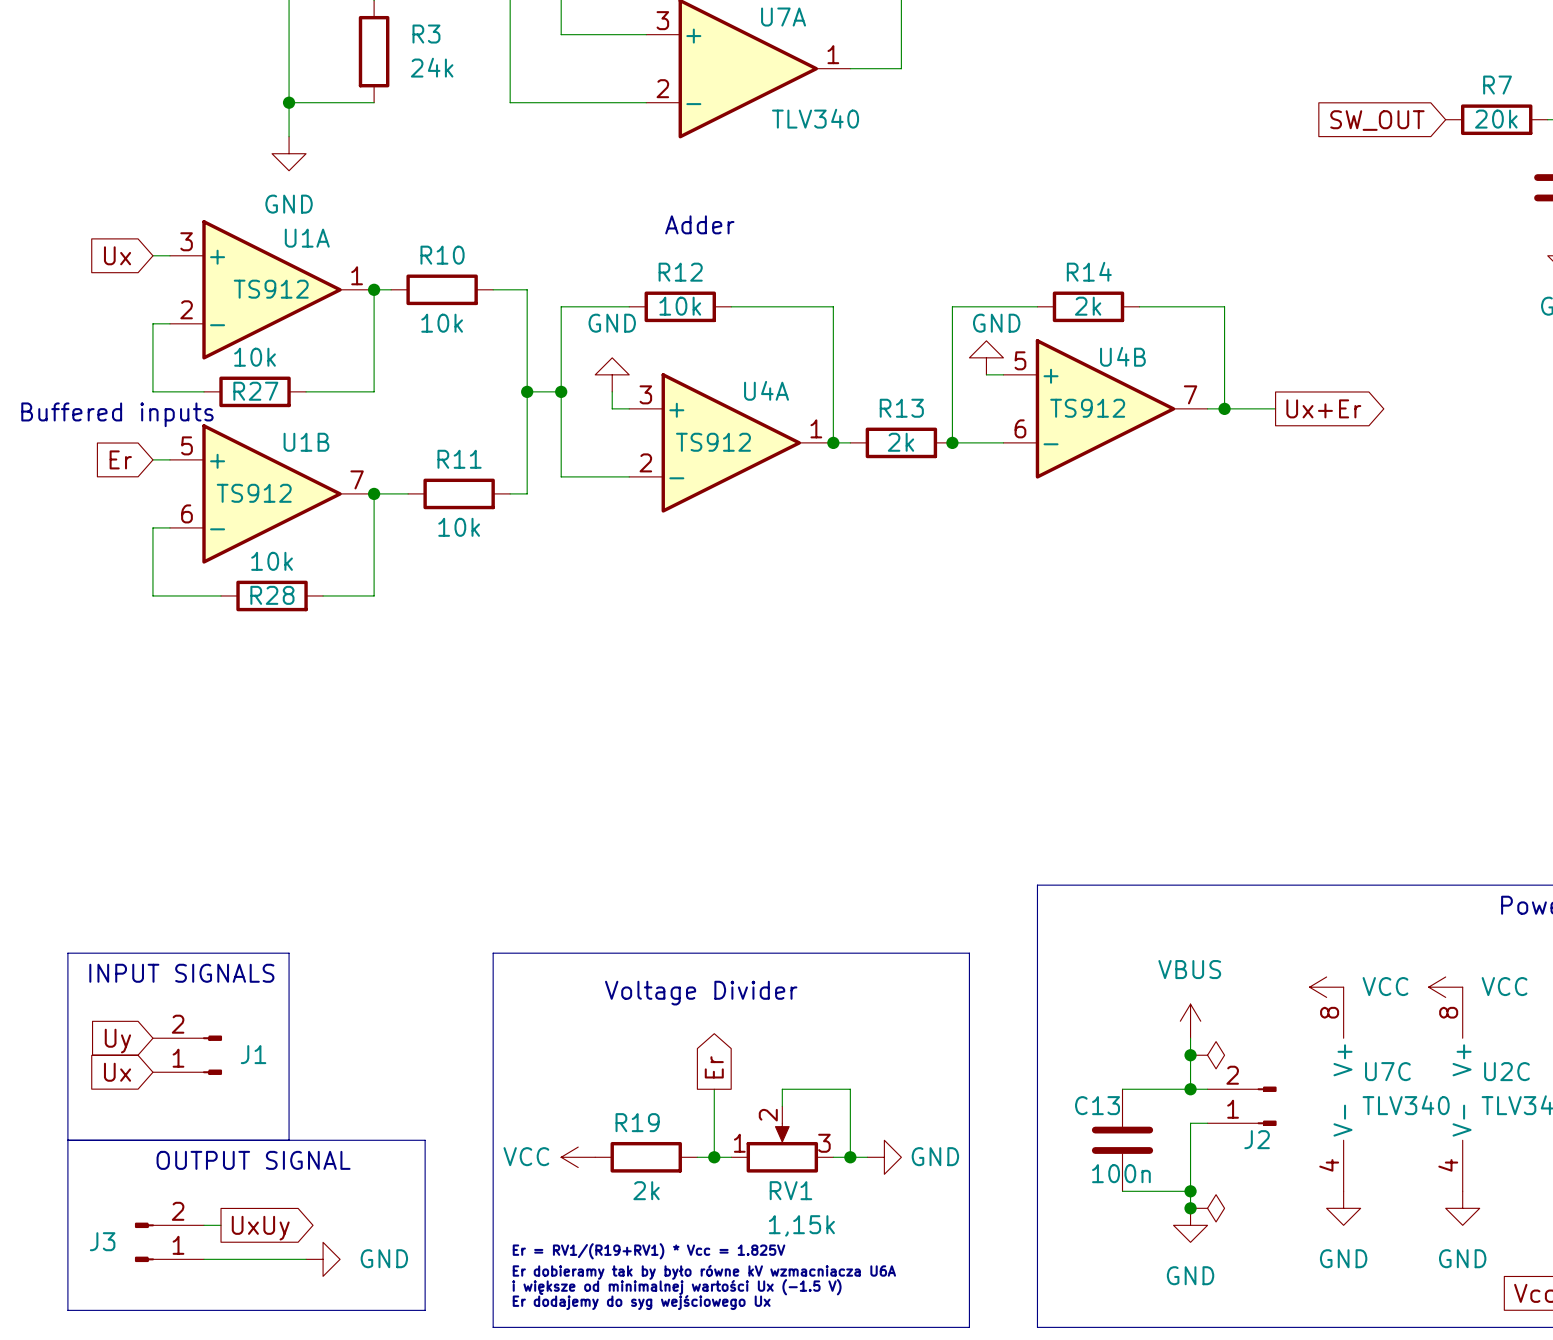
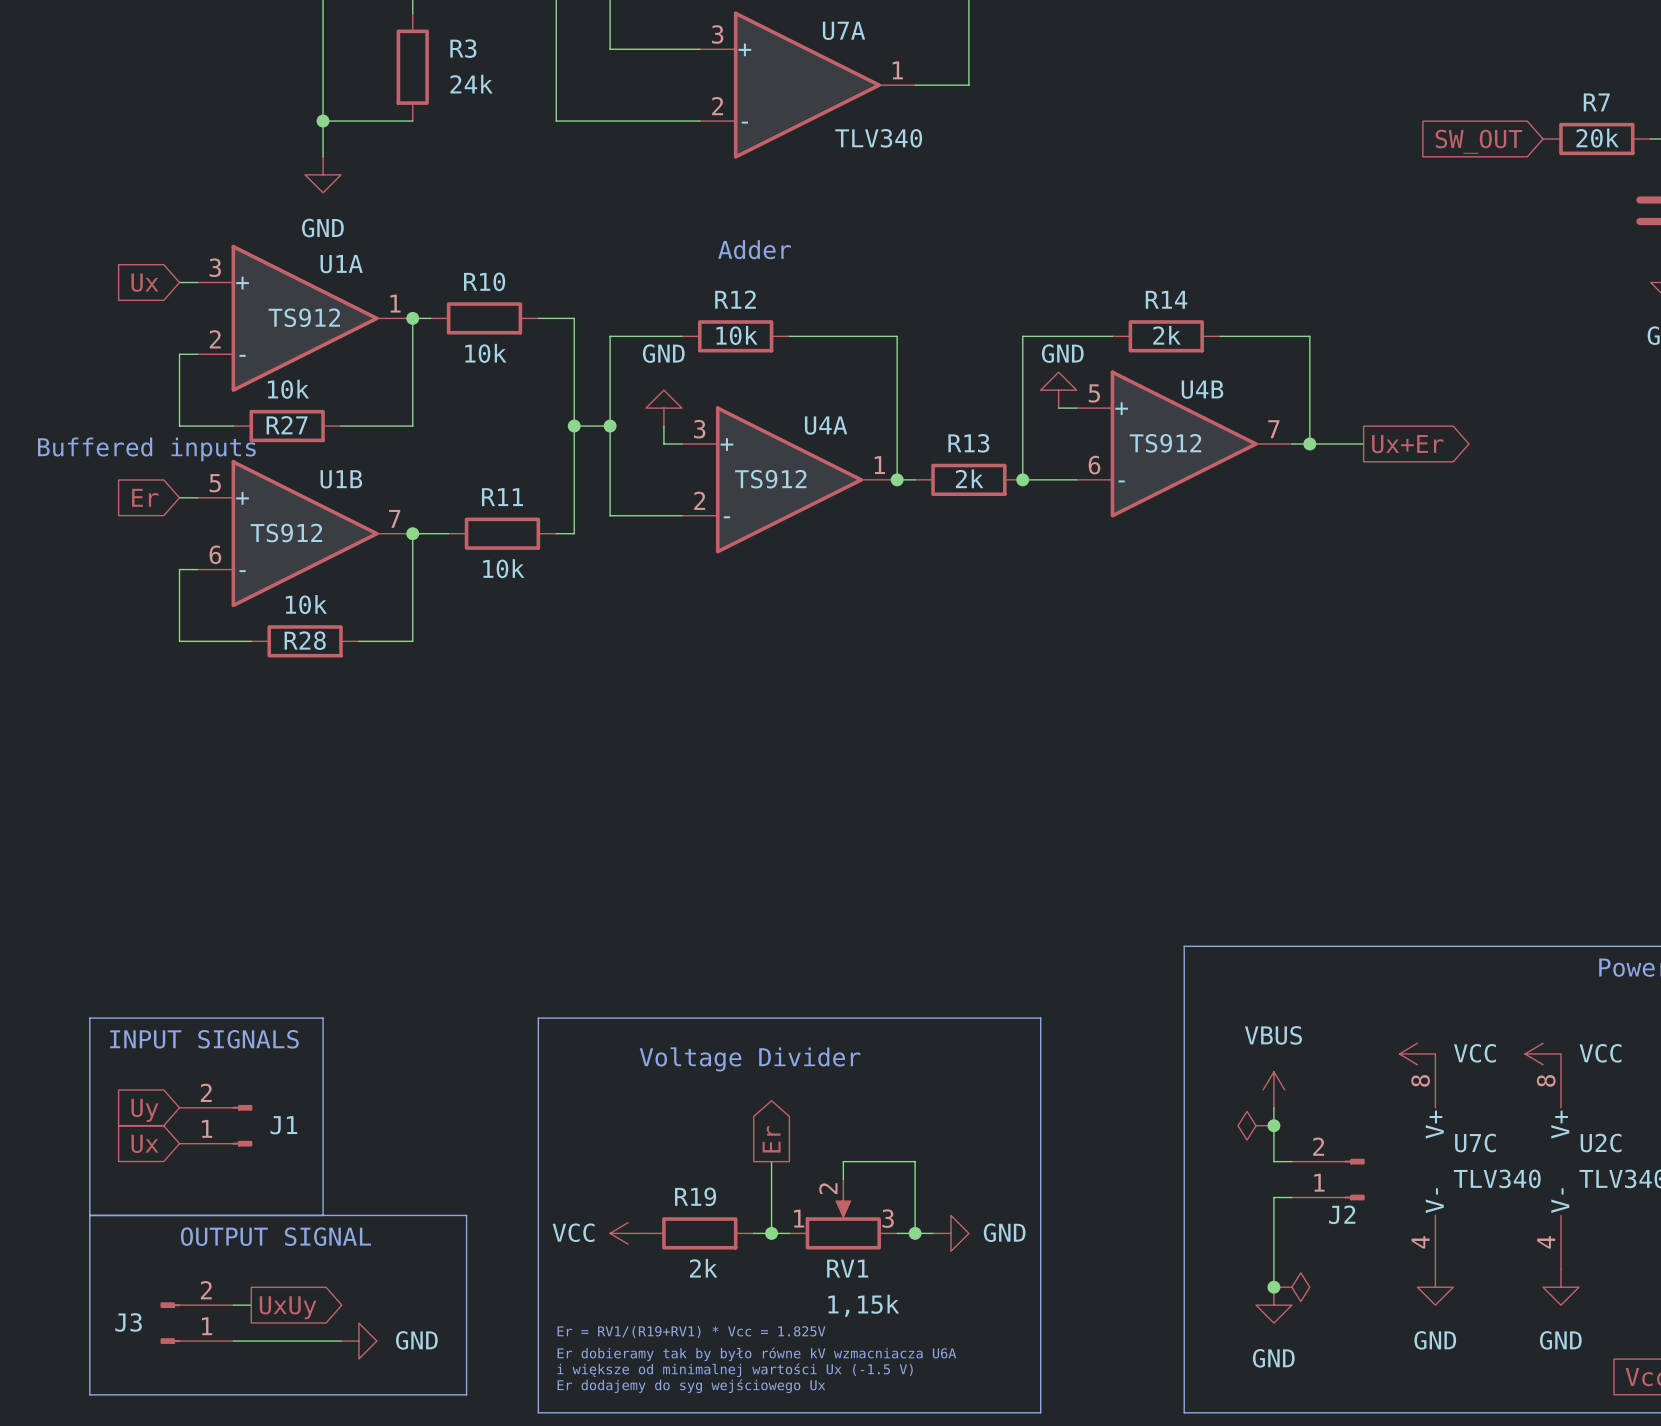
line: (1105, 885) (1037, 885) (1037, 1327) (1105, 1327) -> (1184, 946) (1184, 1412)
power symbol rotation: 0° (1207, 1055) -> 180° (1255, 1125)
power symbol position: (1207, 1055) -> (1255, 1125)
wire: (1122, 1089) (1190, 1089) -> none
junction: (1190, 1089) -> none
C13: 100n (1122, 1140) -> none
wire: (1122, 1191) (1190, 1191) -> none
junction: (1190, 1191) -> none

